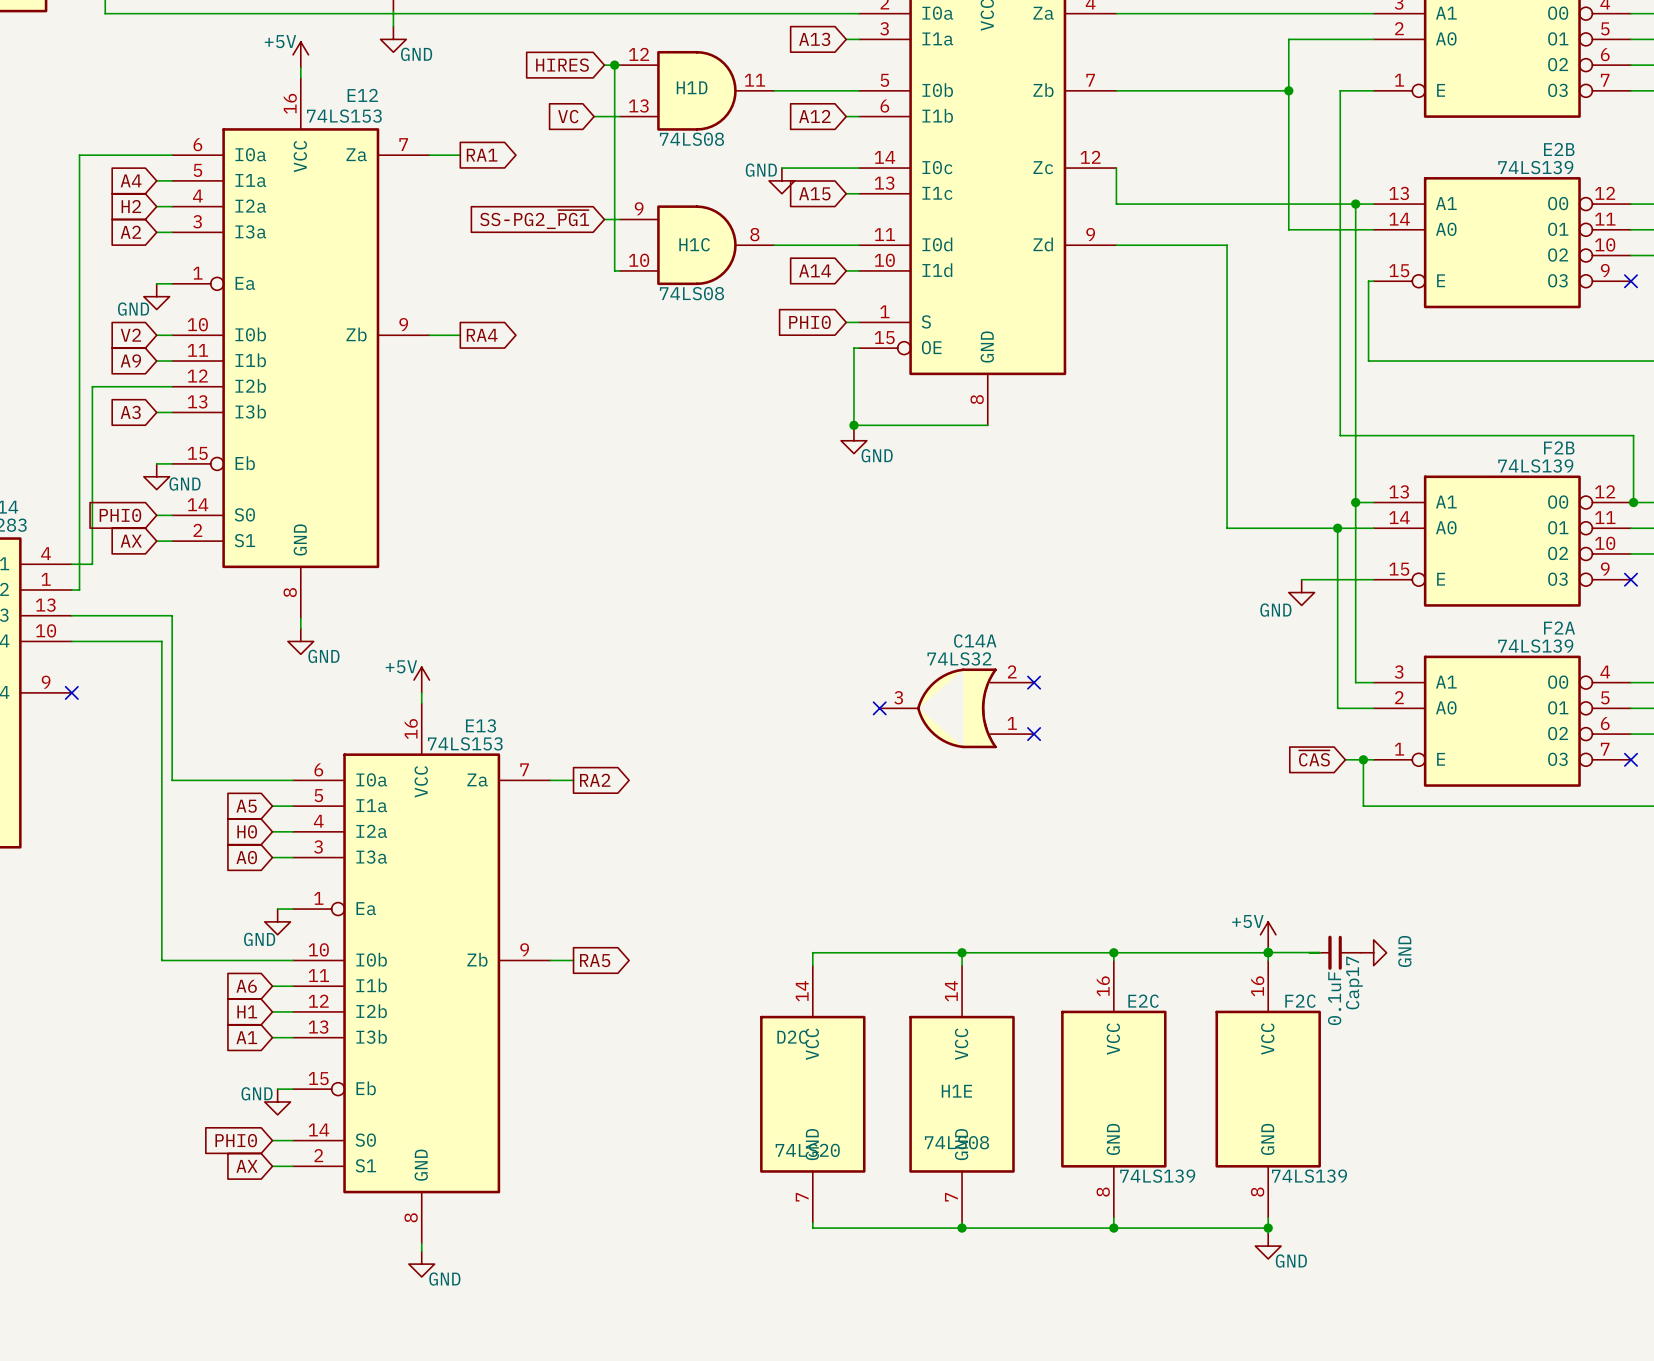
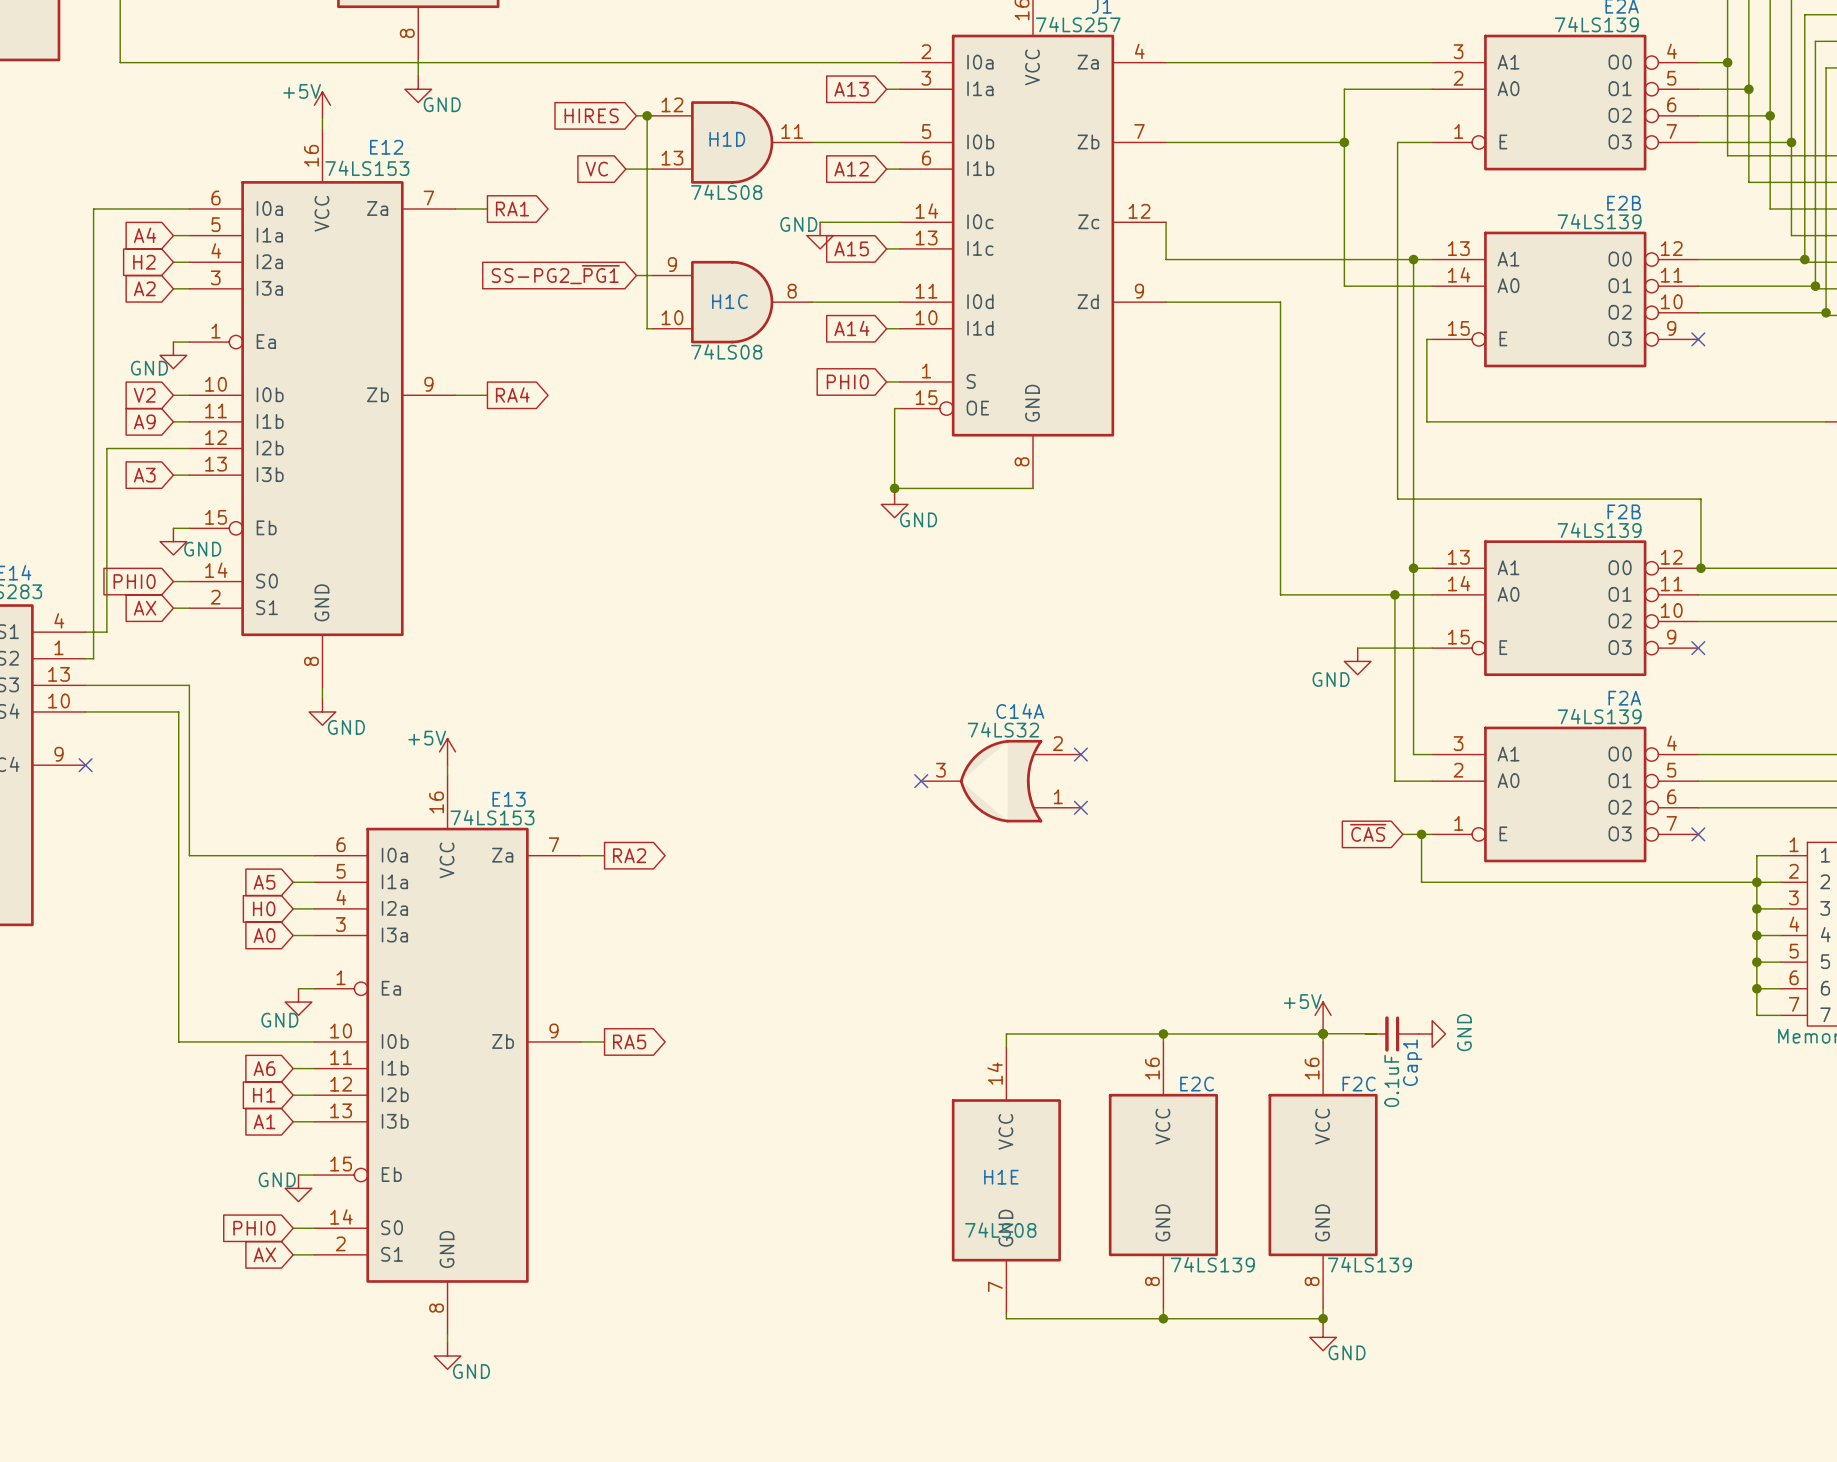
wire: (962, 952) (812, 952) (812, 965) -> none
junction: (962, 952) -> none
Cap17 name: Cap17 (1354, 982) -> Cap1 (1412, 1062)
D2C: 74LS20 (812, 1094) -> none
wire: (812, 1222) (812, 1228) (962, 1228) -> none
junction: (962, 1228) -> none

